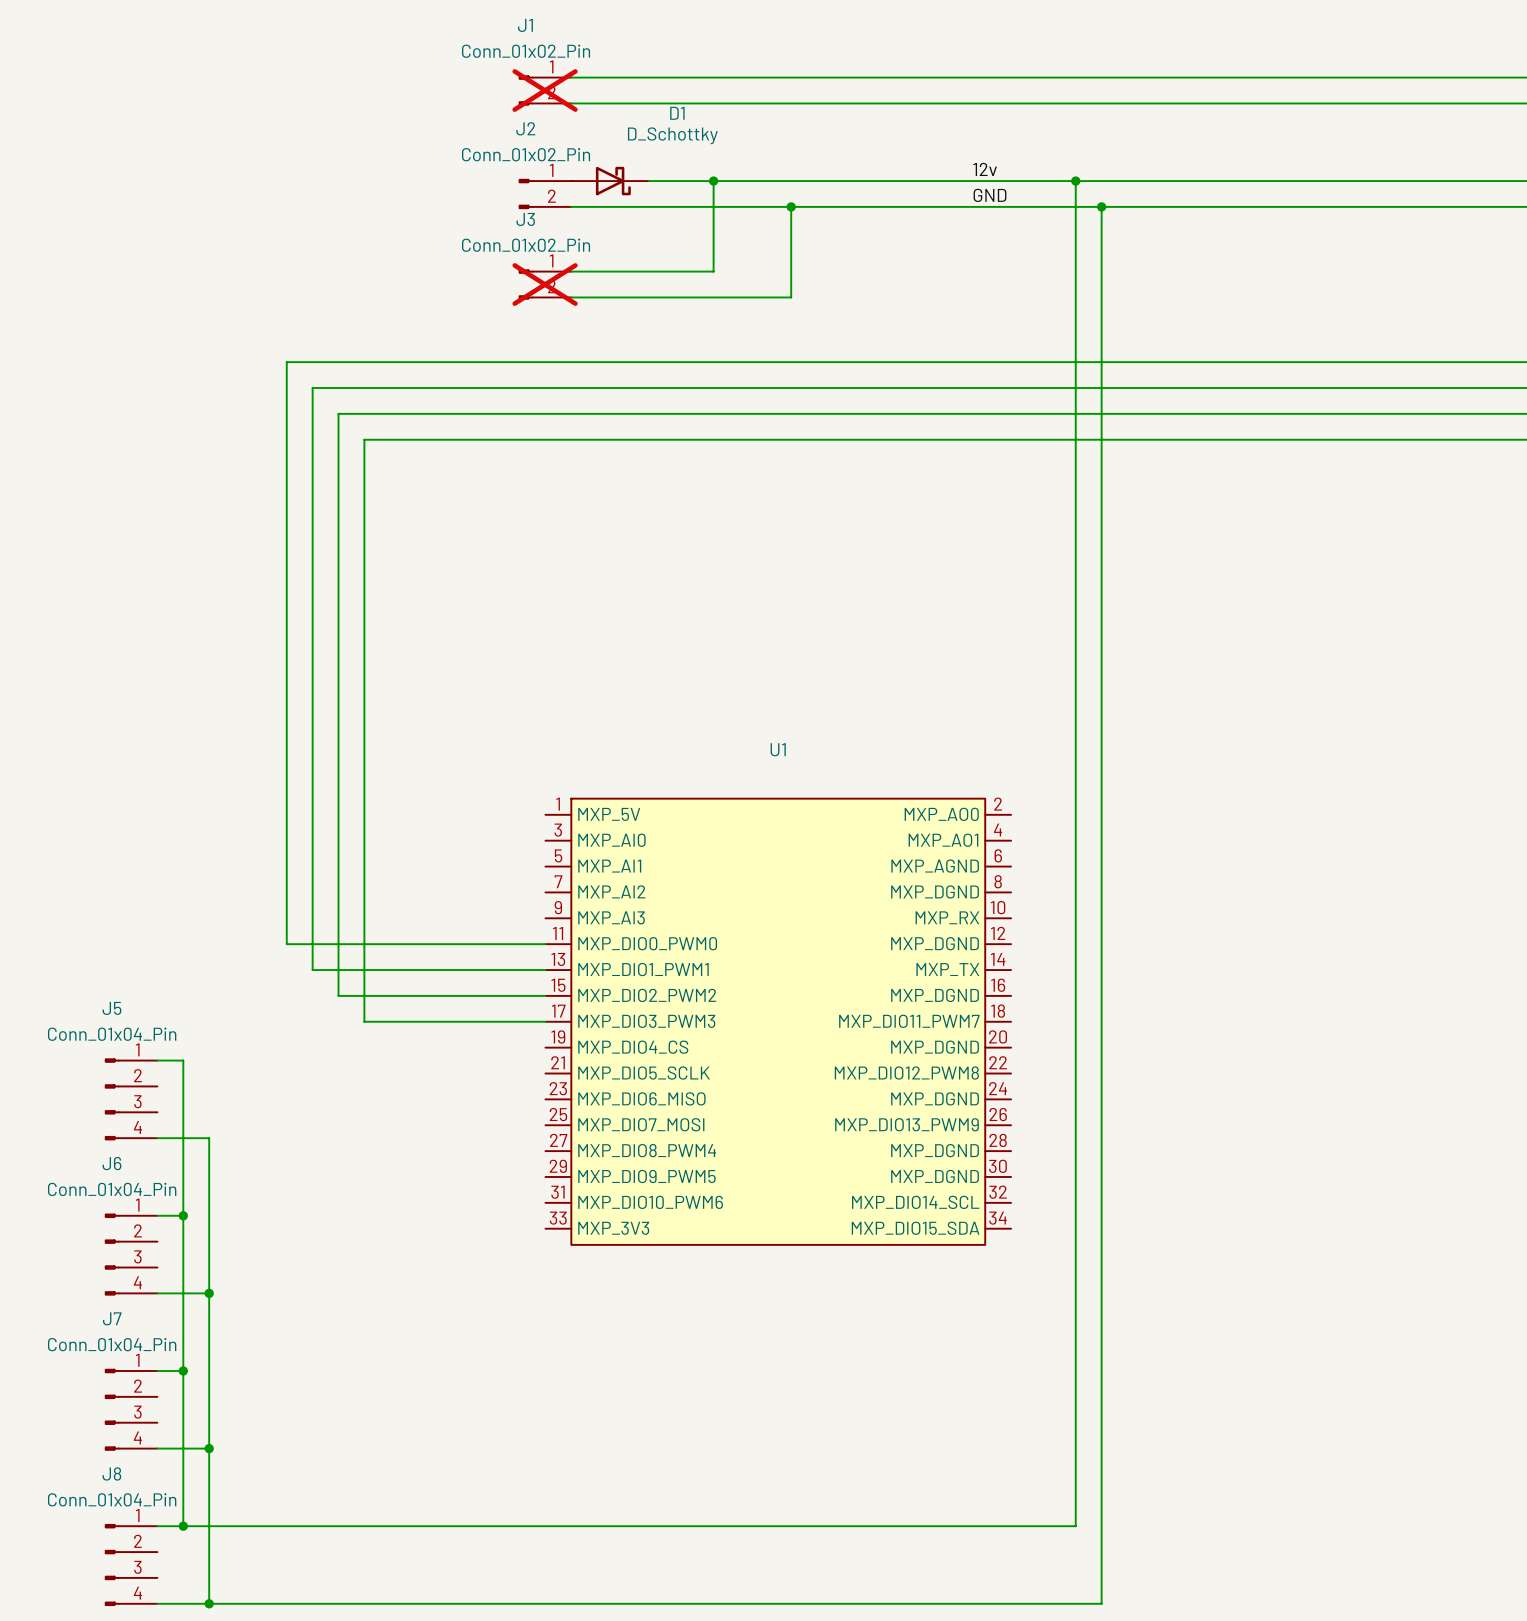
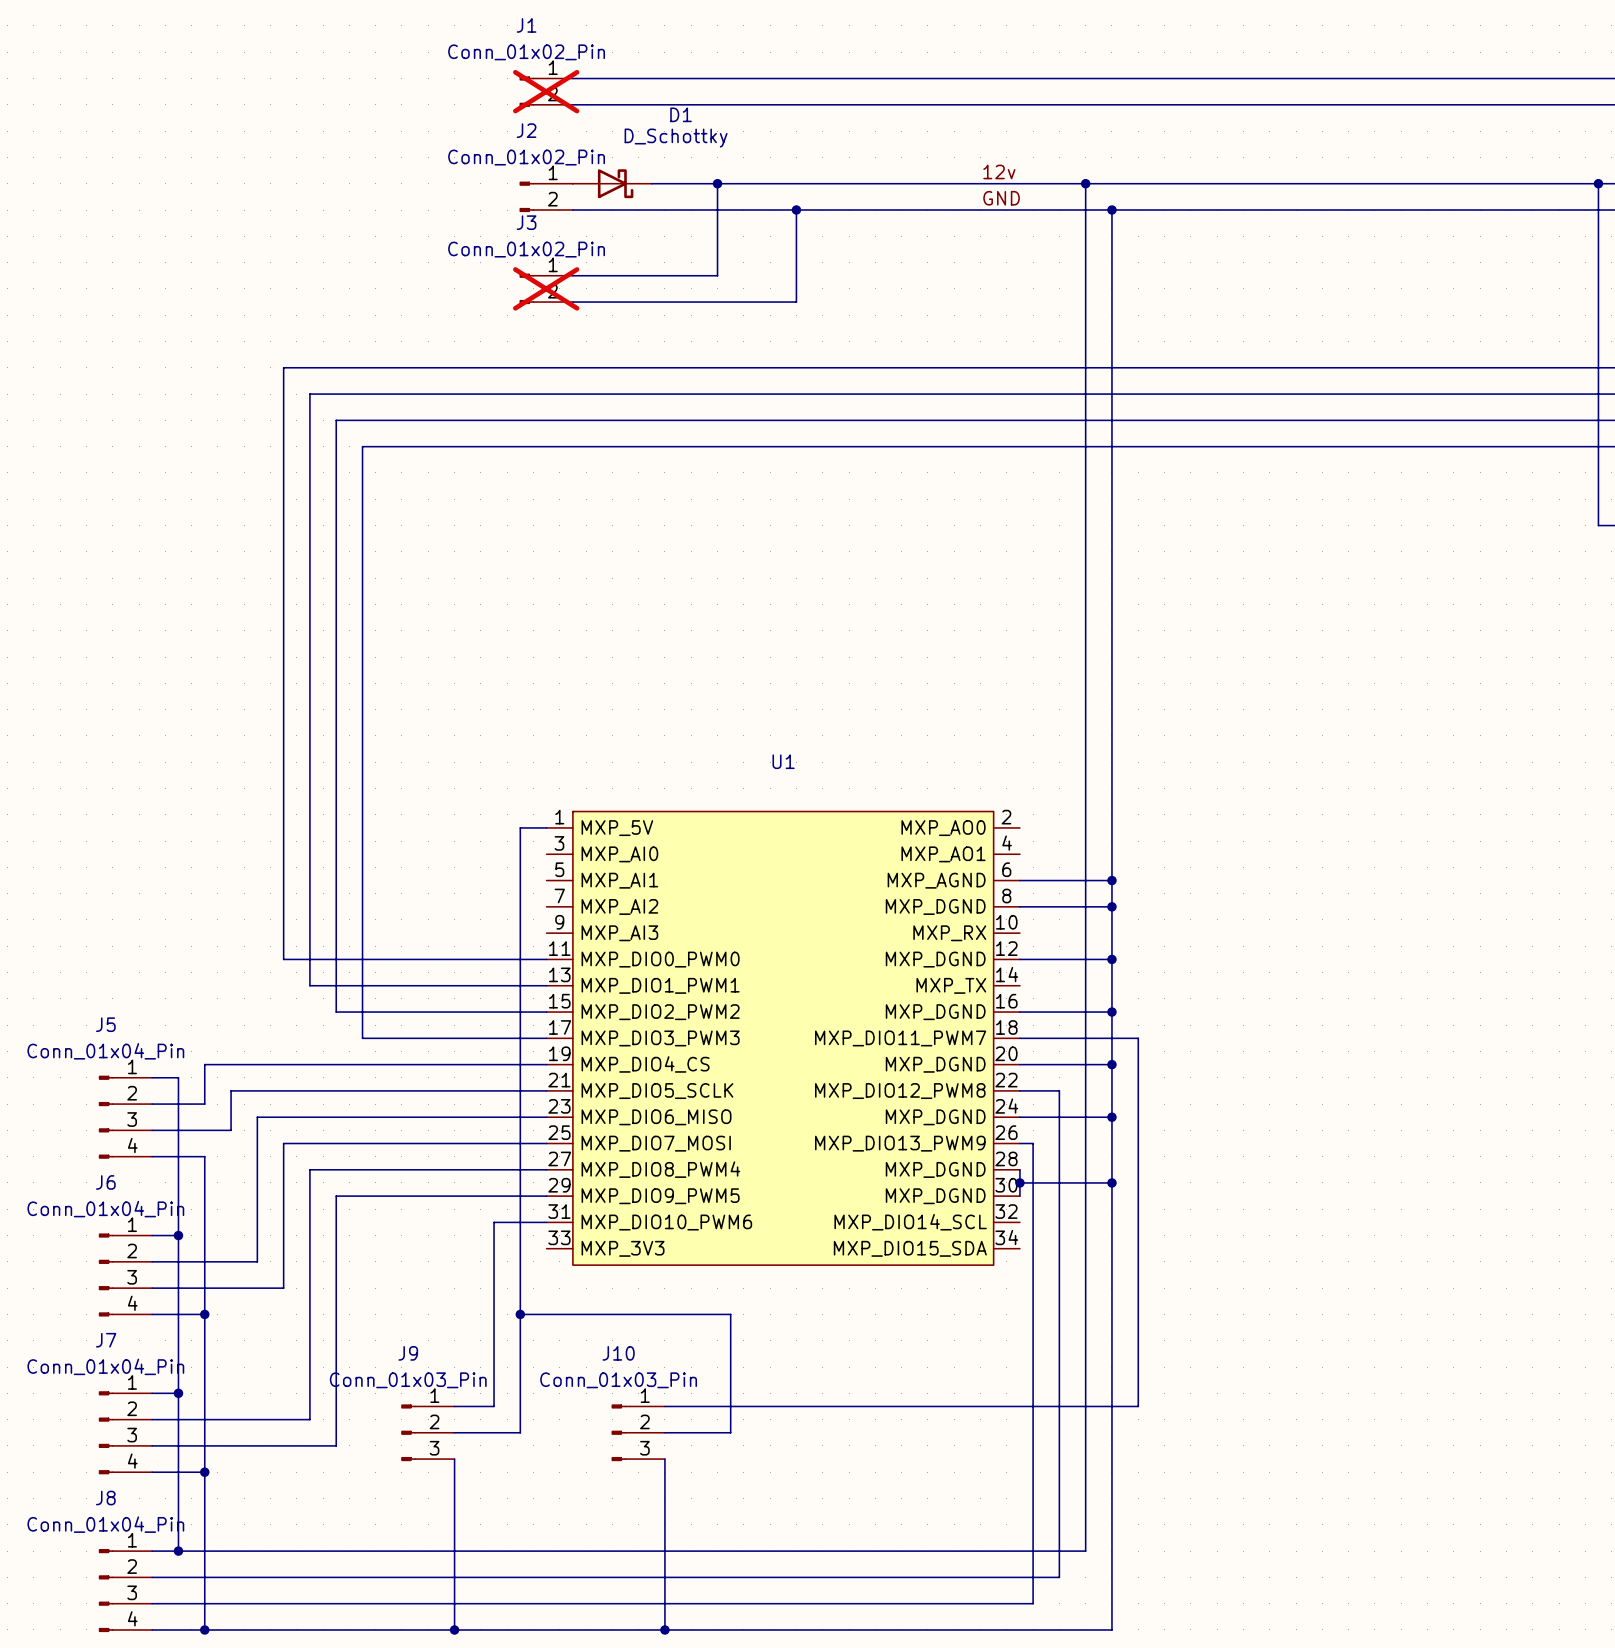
wire: none -> (546, 827) (520, 827) (520, 1432) (454, 1432)
wire: none -> (1019, 880) (1111, 880)
junction: none -> (1111, 880)
wire: none -> (1019, 906) (1111, 906)
junction: none -> (1111, 906)
wire: none -> (1019, 959) (1111, 959)
junction: none -> (1111, 959)
wire: none -> (1019, 1012) (1111, 1012)
junction: none -> (1111, 1012)
wire: none -> (1019, 1038) (1138, 1038) (1138, 1406) (664, 1406)
wire: none -> (546, 1064) (204, 1064) (204, 1104) (152, 1104)
wire: none -> (1019, 1064) (1111, 1064)
junction: none -> (1111, 1064)
wire: none -> (546, 1090) (231, 1090) (231, 1130) (152, 1130)
wire: none -> (1019, 1090) (1059, 1090) (1059, 1577) (152, 1577)
wire: none -> (546, 1117) (257, 1117) (257, 1261) (152, 1261)
wire: none -> (1019, 1117) (1111, 1117)
junction: none -> (1111, 1117)
wire: none -> (546, 1143) (283, 1143) (283, 1288) (152, 1288)
wire: none -> (1019, 1143) (1033, 1143) (1033, 1603) (152, 1603)
wire: none -> (546, 1169) (309, 1169) (309, 1419) (152, 1419)
wire: none -> (1019, 1169) (1019, 1196)
wire: none -> (1019, 1182) (1111, 1182)
junction: none -> (1019, 1182)
junction: none -> (1111, 1182)
wire: none -> (546, 1196) (336, 1196) (336, 1445) (152, 1445)
wire: none -> (546, 1222) (494, 1222) (494, 1406) (454, 1406)
wire: none -> (520, 1314) (730, 1314) (730, 1432) (664, 1432)
junction: none -> (520, 1314)
J9: none -> Conn_01x03_Pin (427, 1432)
J10: none -> Conn_01x03_Pin (638, 1432)
wire: none -> (454, 1459) (454, 1629)
wire: none -> (664, 1459) (664, 1629)
junction: none -> (454, 1629)
junction: none -> (664, 1629)

